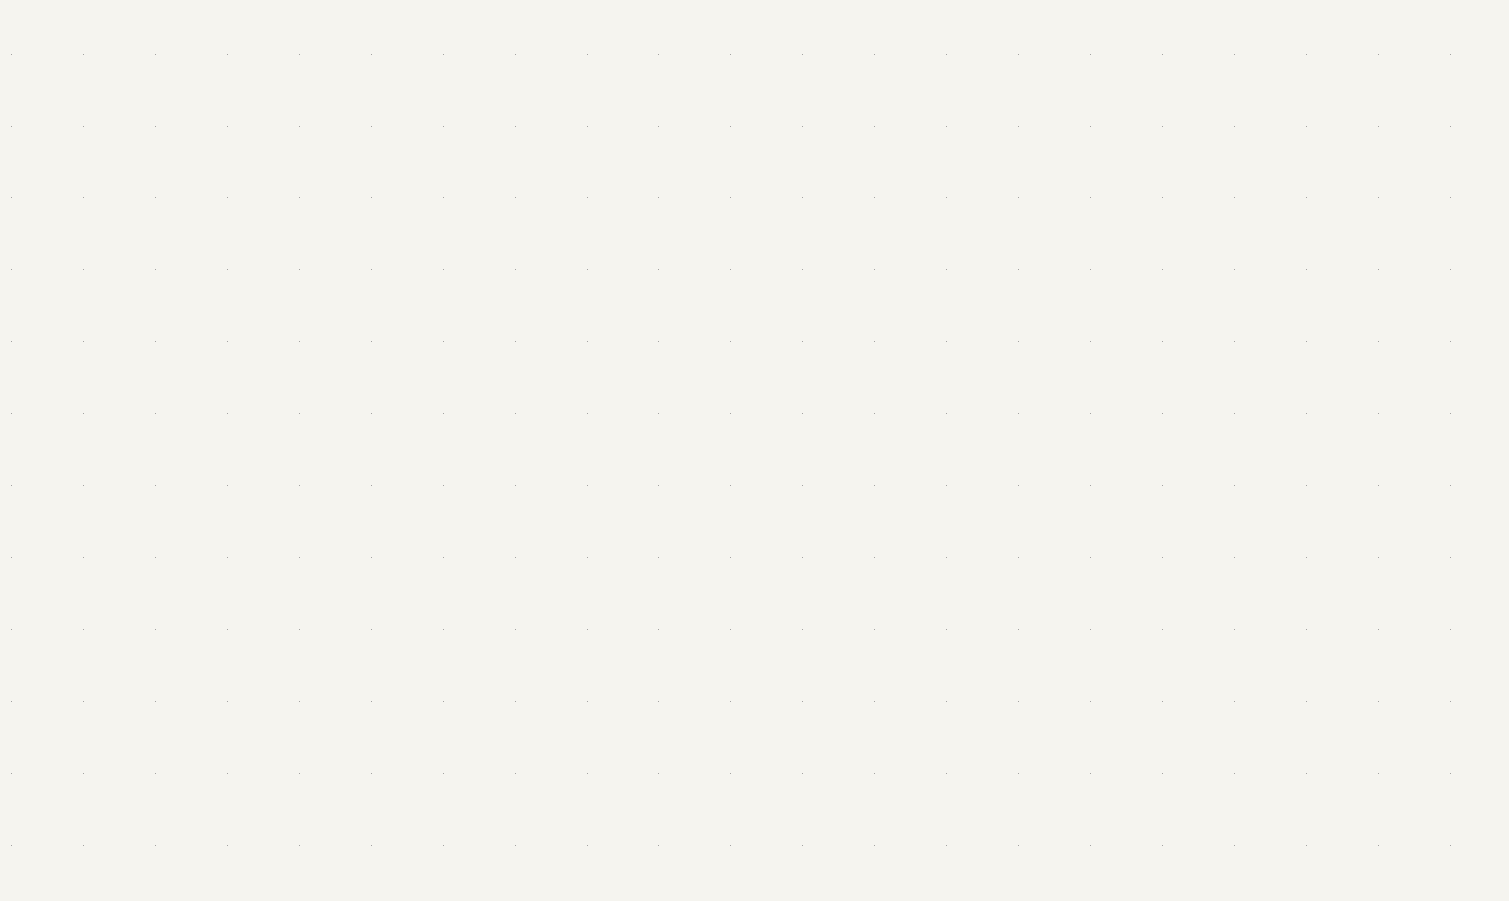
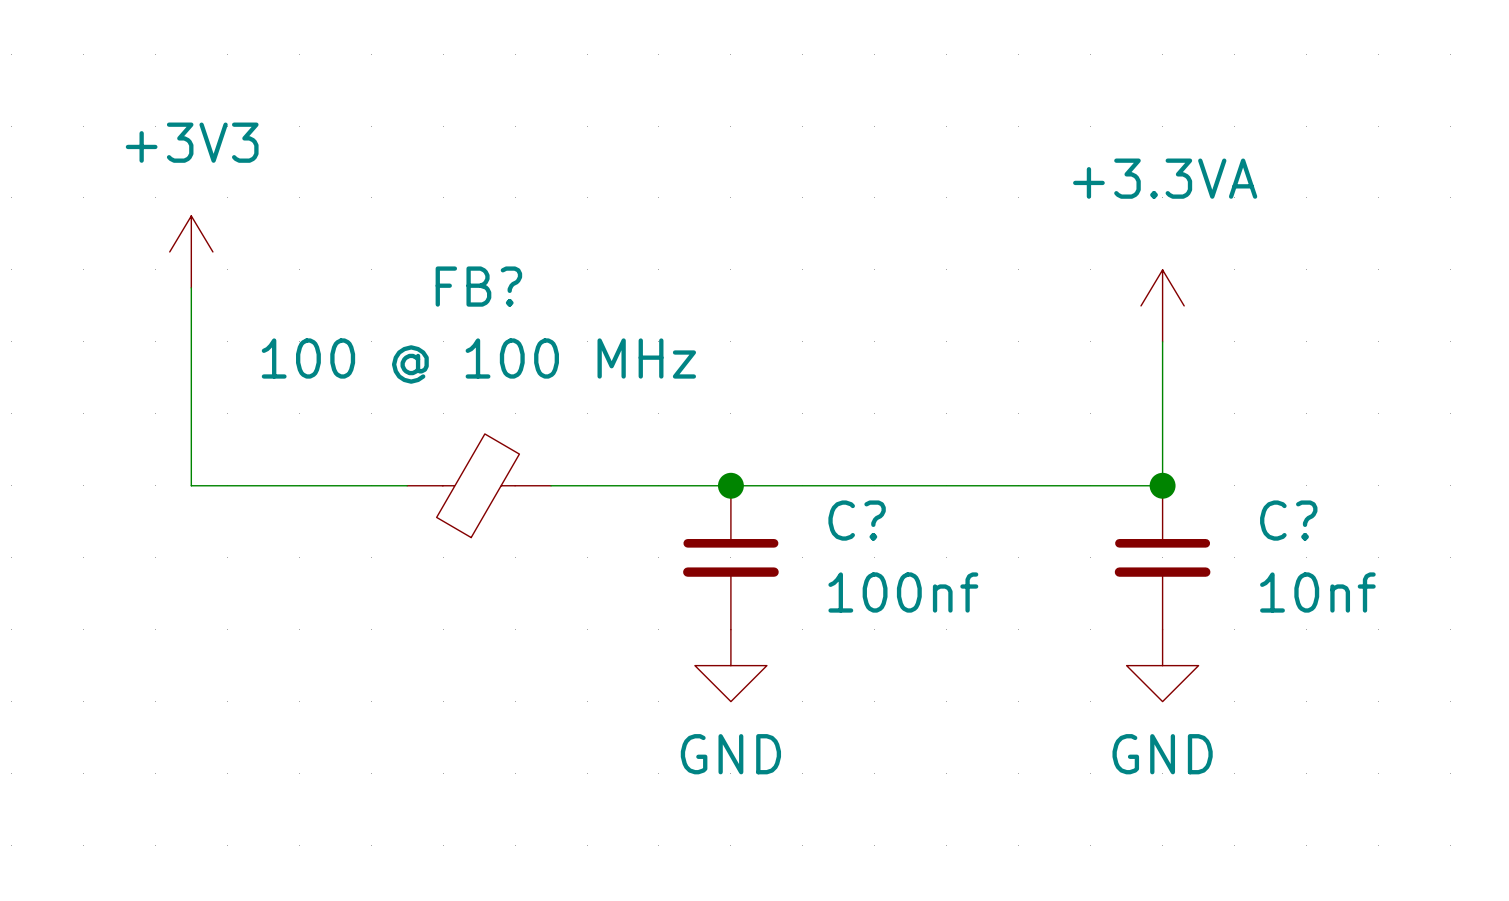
power symbol: none -> +3V3 (191, 251)
wire: none -> (191, 287) (191, 485) (407, 485)
power symbol: none -> +3.3VA (1162, 305)
wire: none -> (1162, 341) (1162, 485) (551, 485)
FB?: none -> 100 @ 100 MHz (479, 485)
junction: none -> (730, 485)
junction: none -> (1162, 485)
C?: none -> 100nf (730, 557)
C?: none -> 10nf (1162, 557)
power symbol: none -> GND (730, 665)
power symbol: none -> GND (1162, 665)

